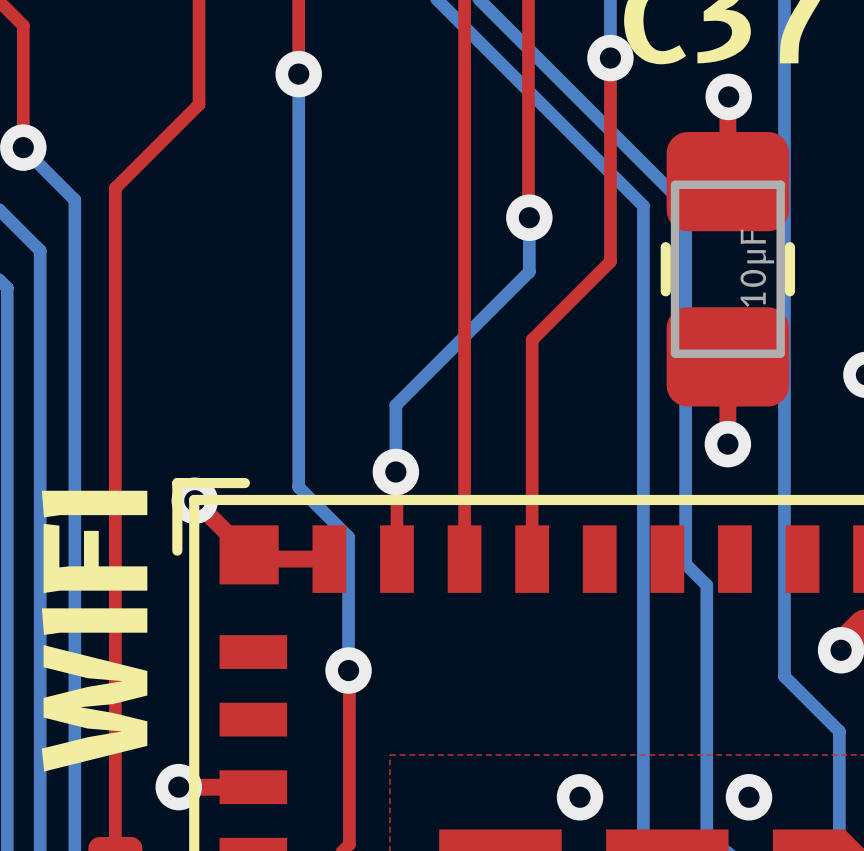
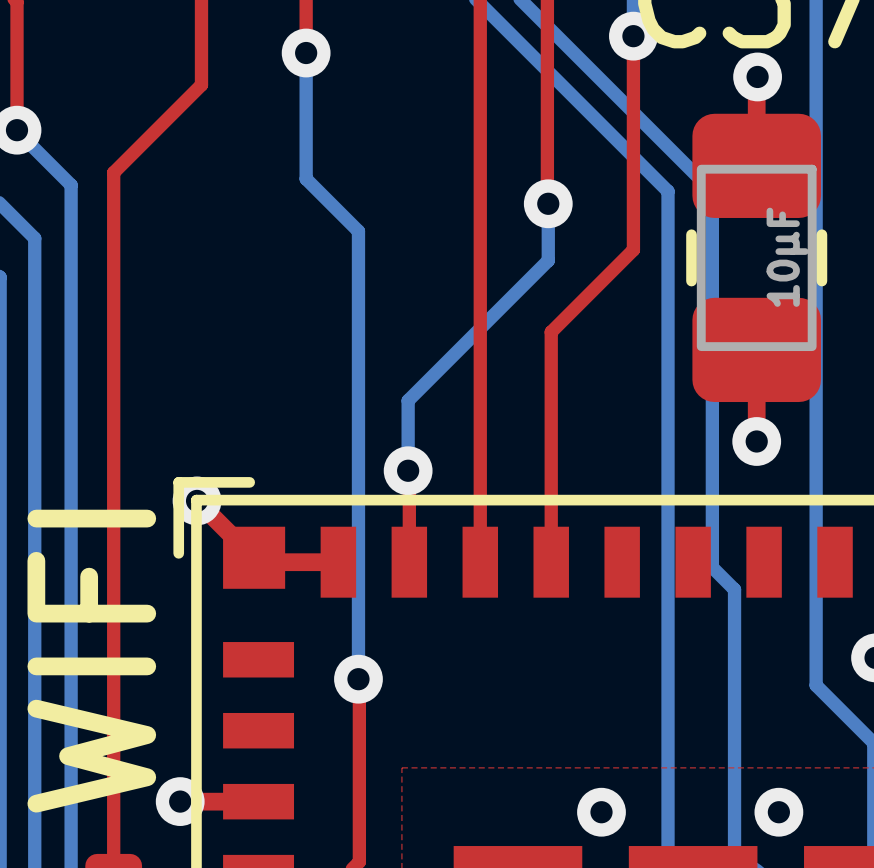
bottom track: (298, 194) (298, 487) (348, 537) -> (306, 178) (358, 231) (358, 539)

